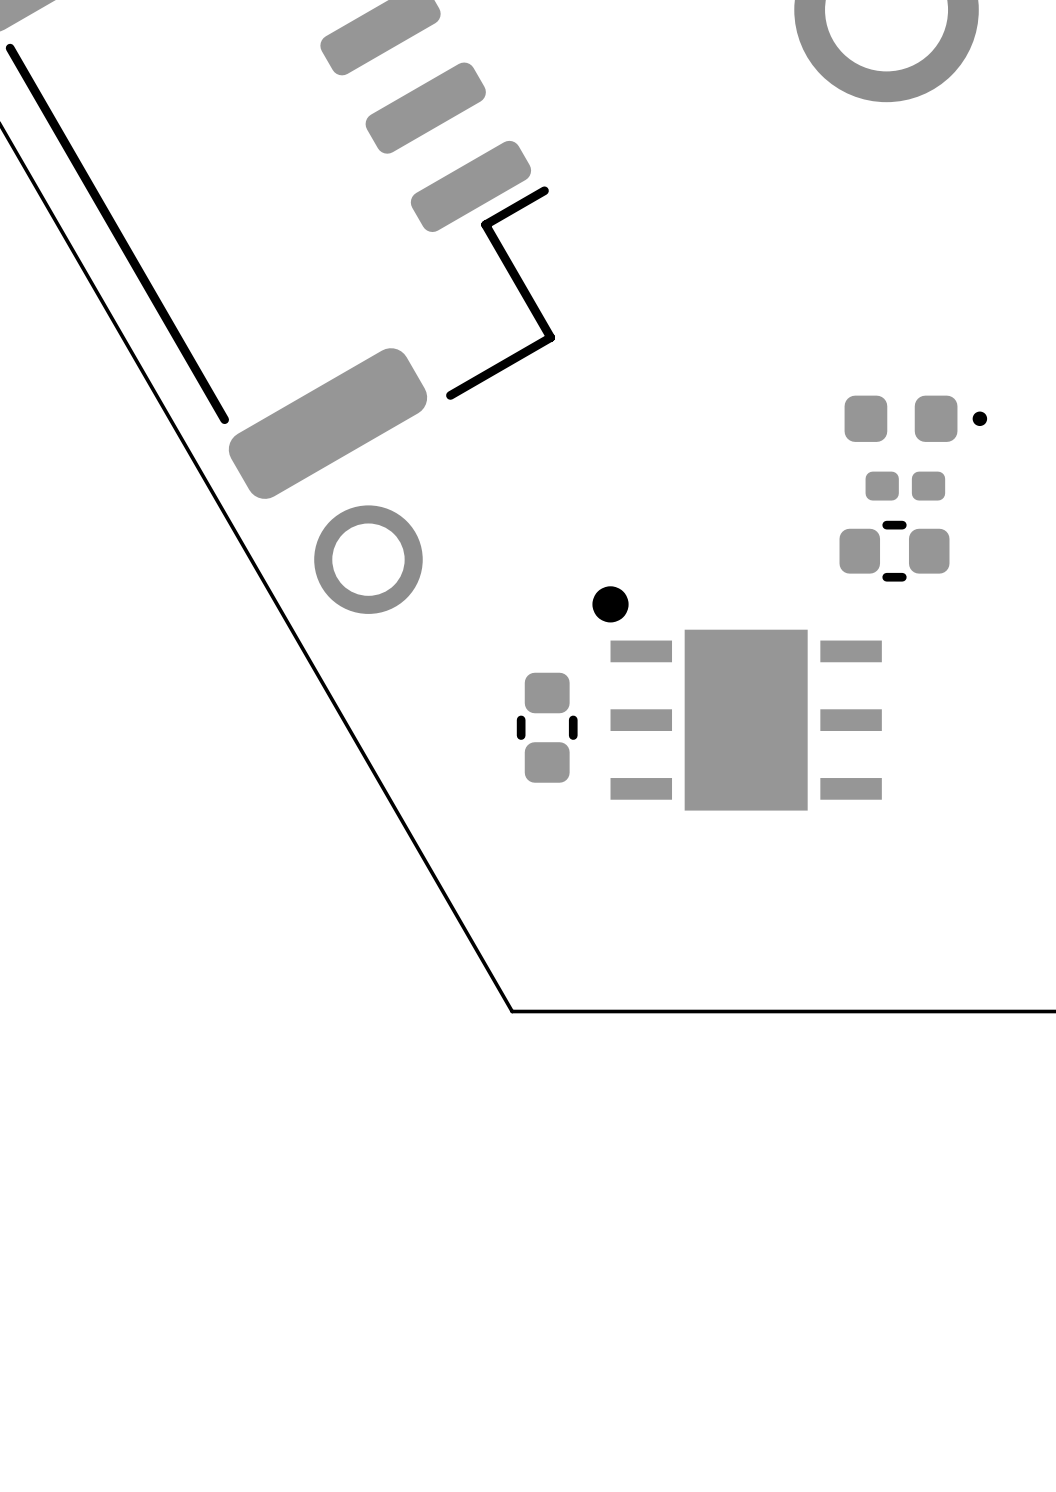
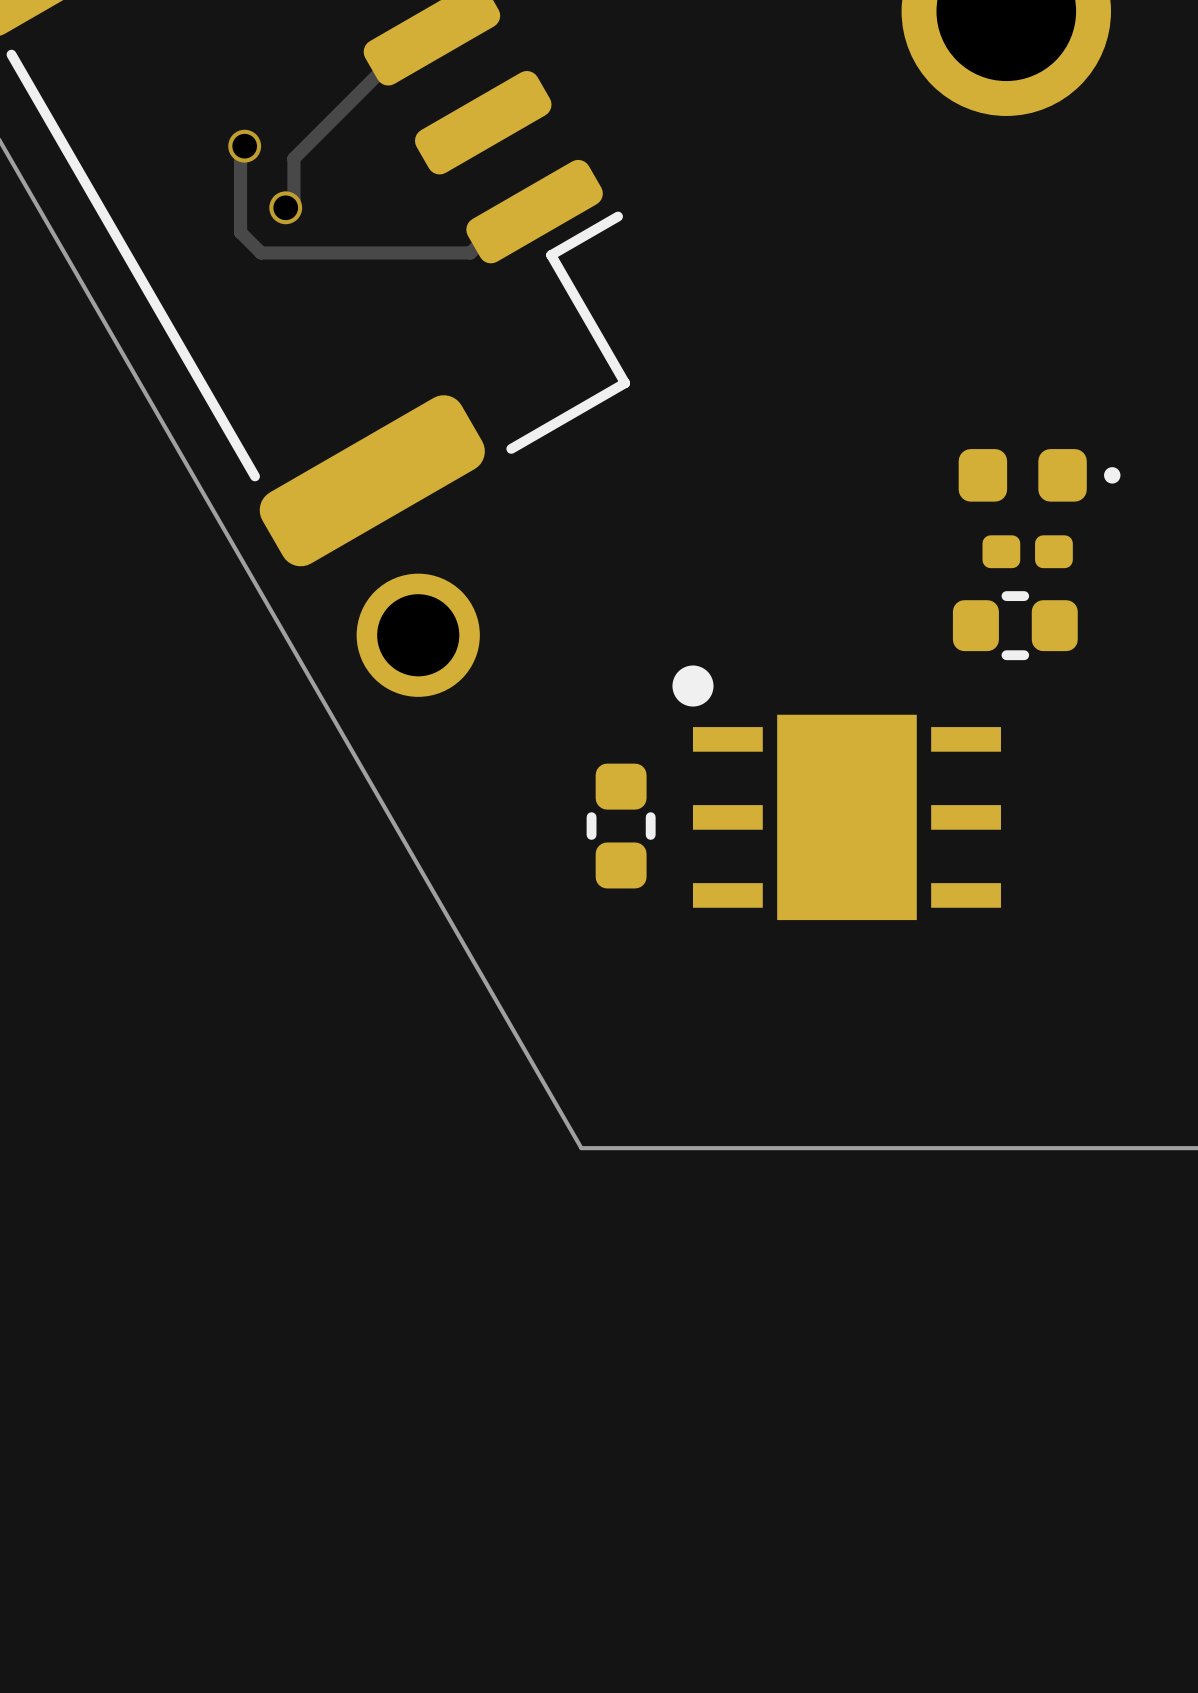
track: none -> (431, 33) (418, 33) (293, 158) (293, 199) (285, 207)
track: none -> (244, 146) (240, 150) (240, 232) (261, 252) (470, 252) (511, 211) (534, 211)
via: none -> (244, 146)
via: none -> (285, 207)

